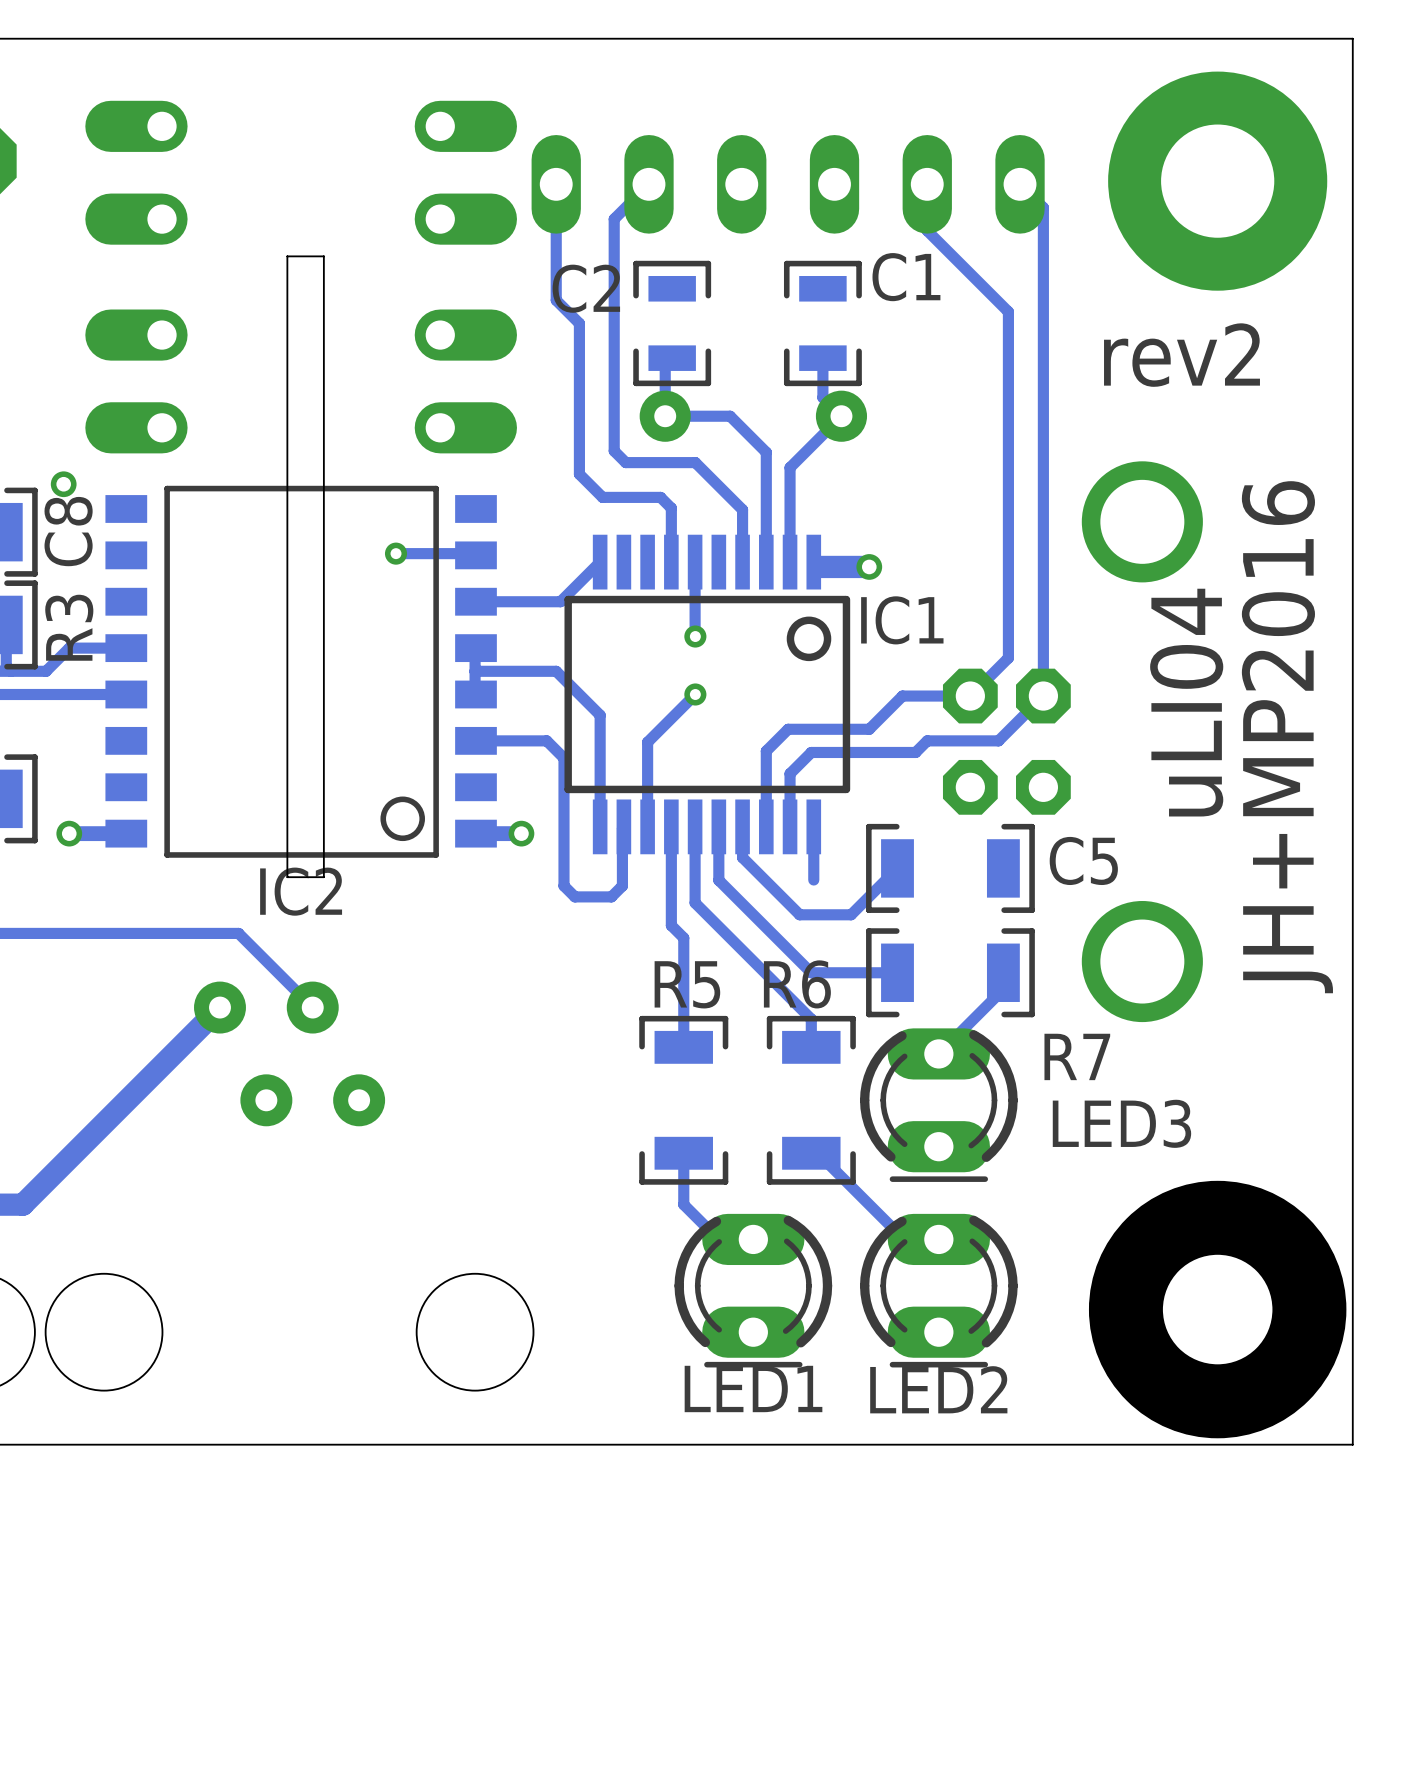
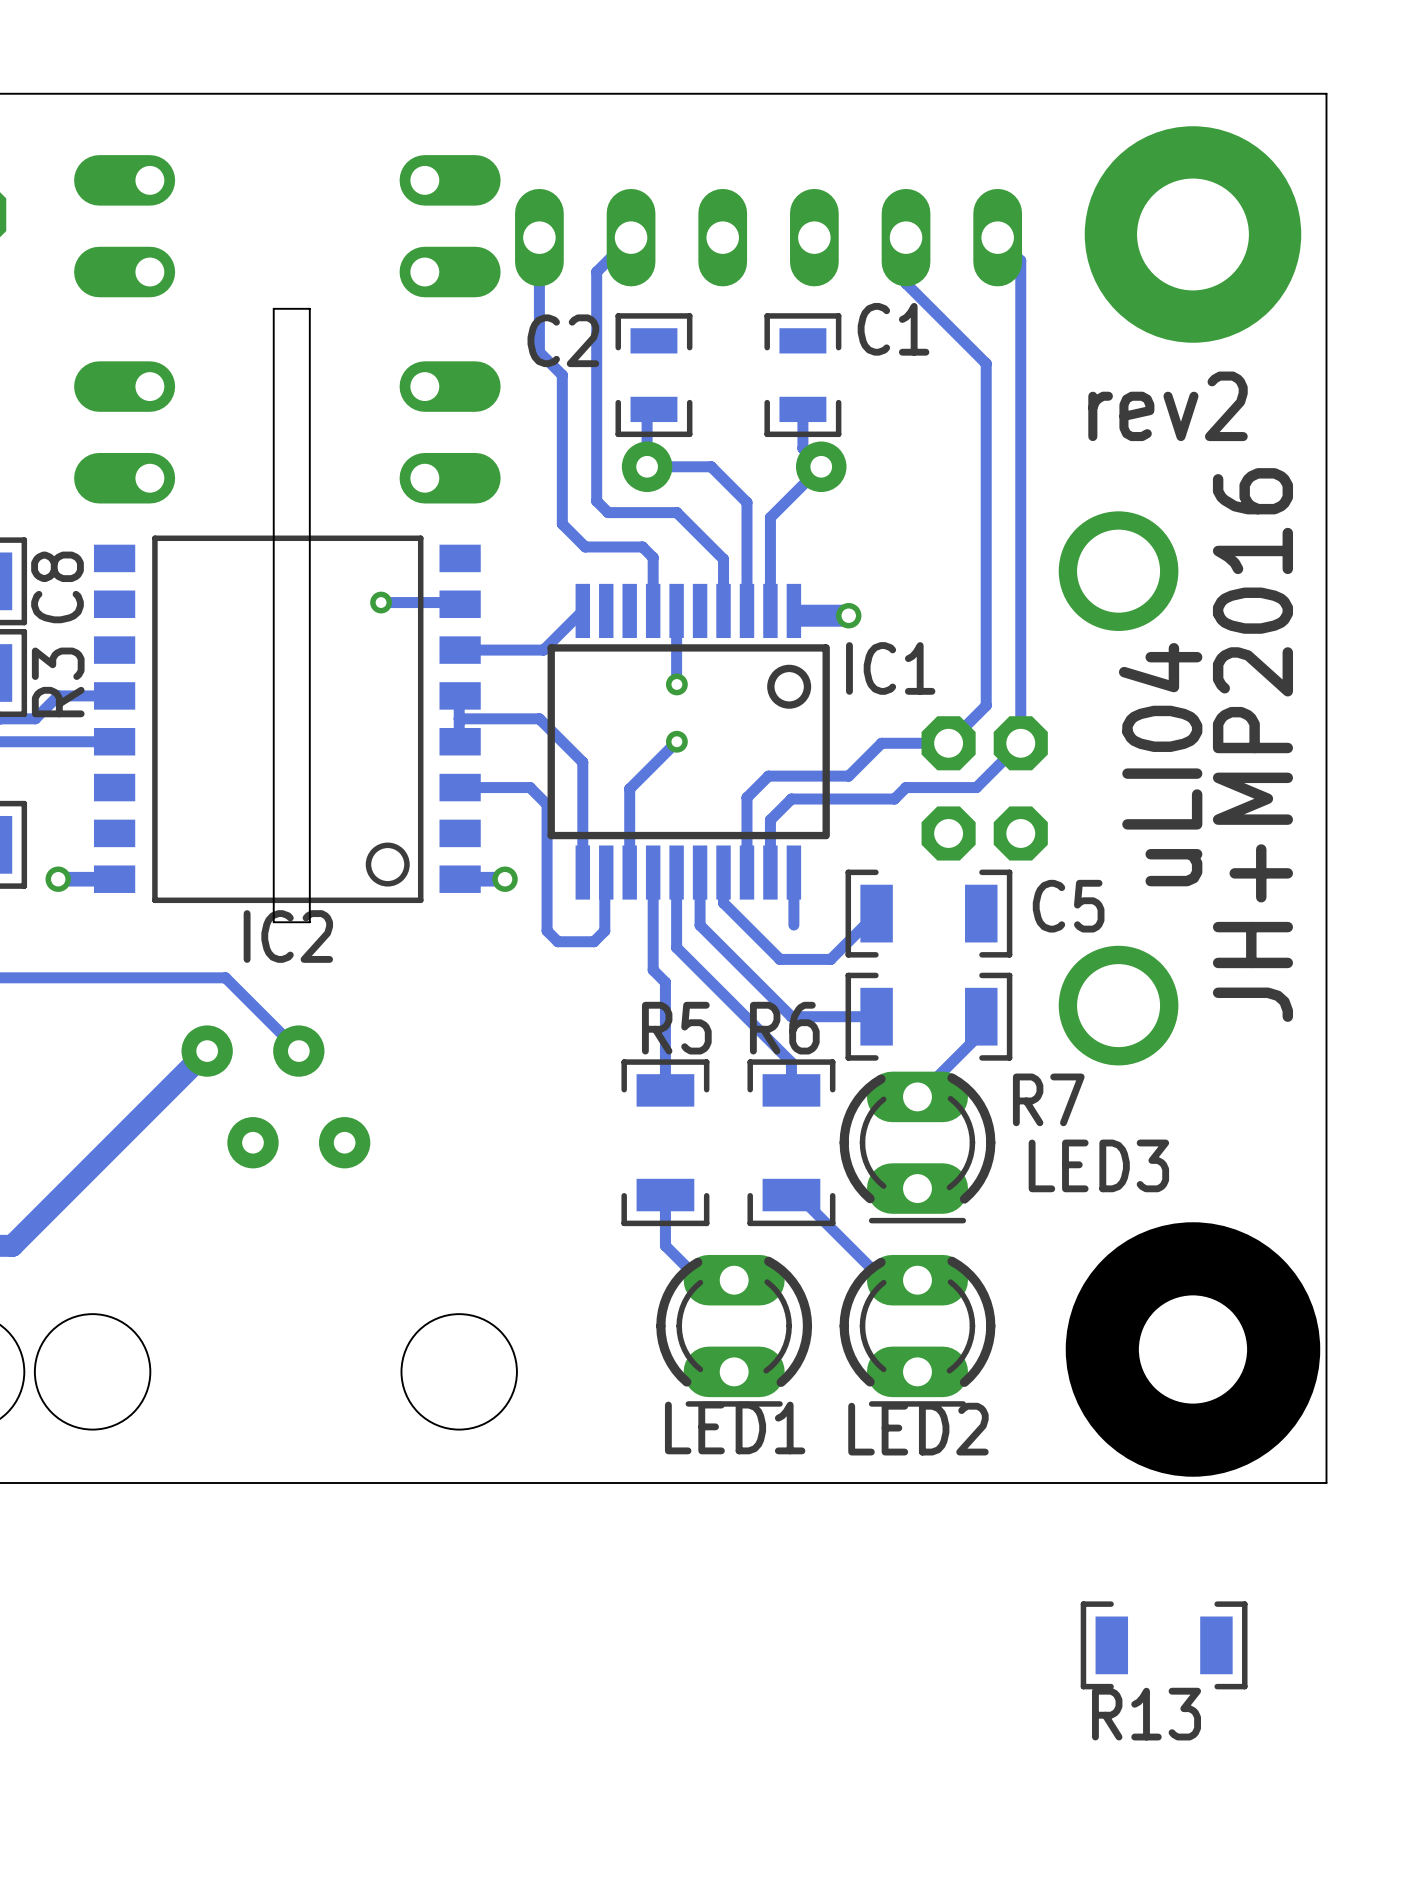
via: (63, 484) -> none
R13: none -> (1164, 1645)

